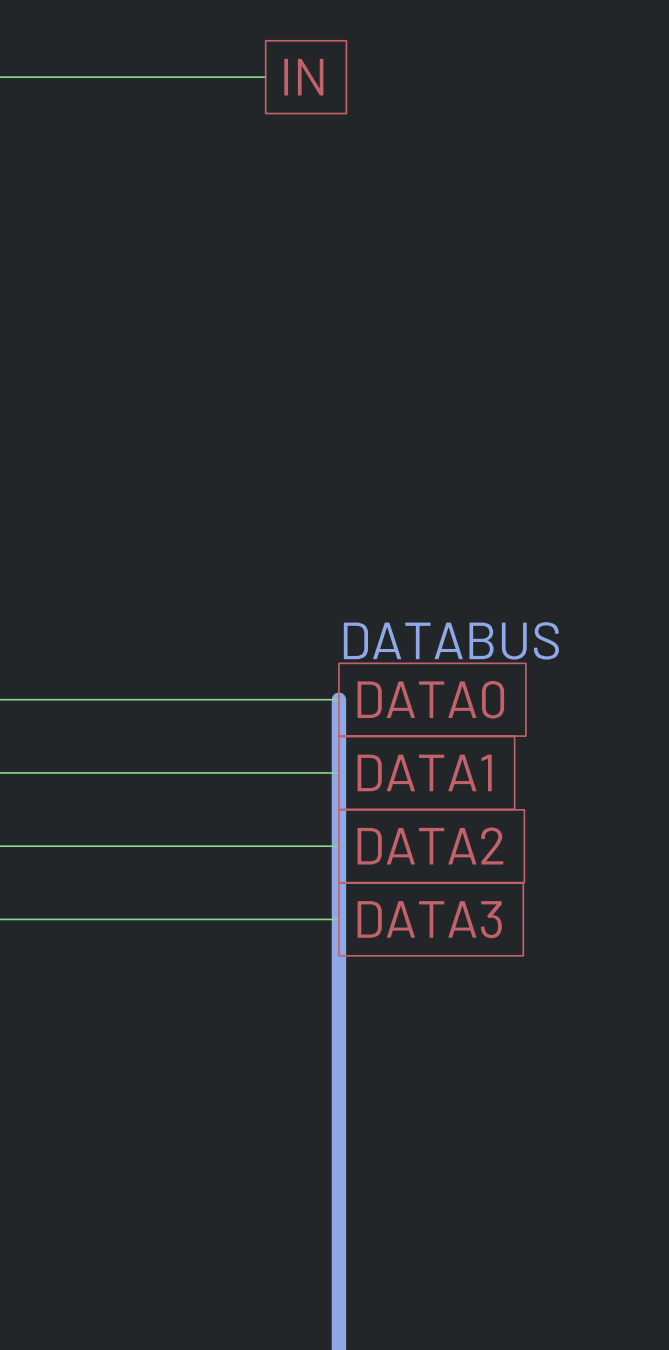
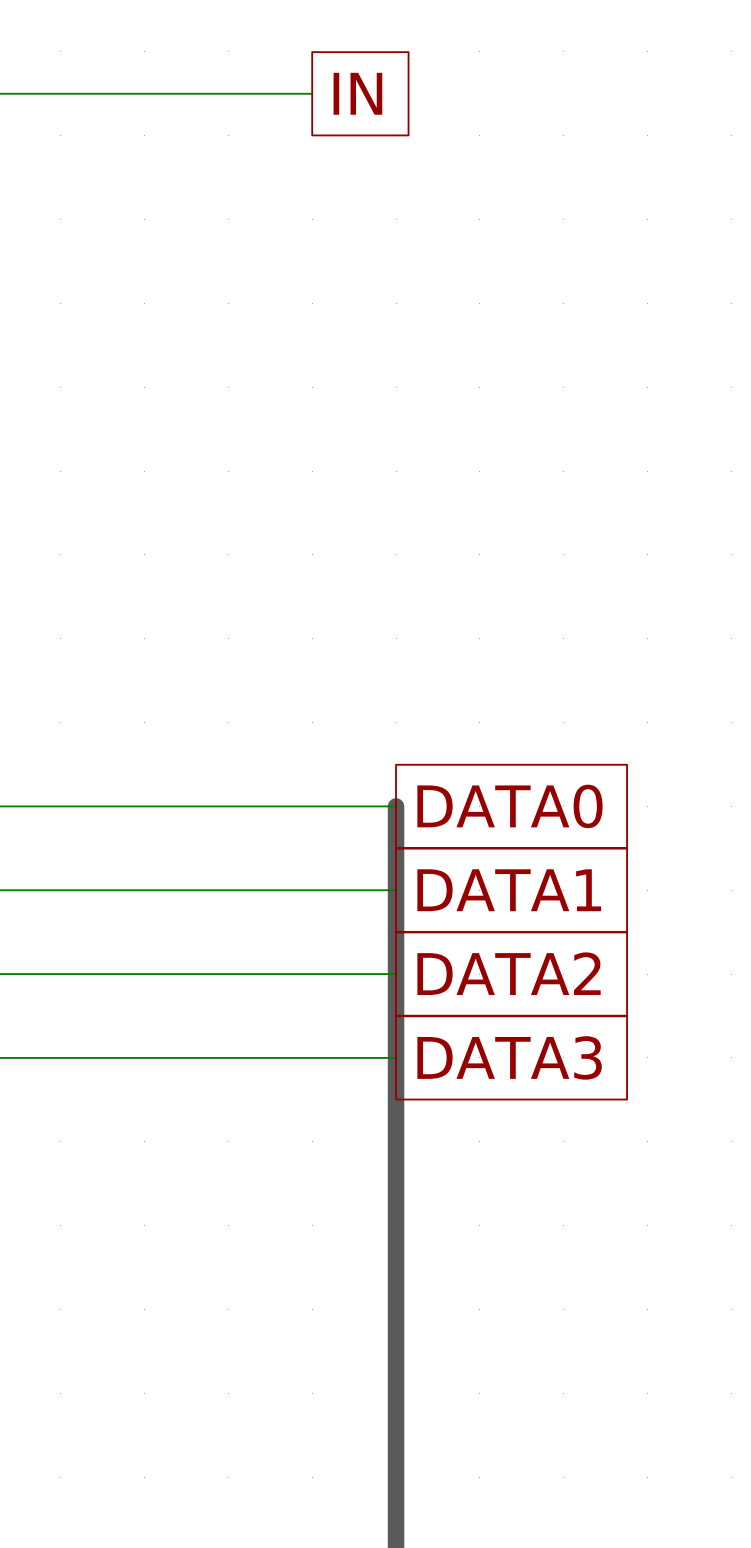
text: DATABUS (451, 640) -> none

